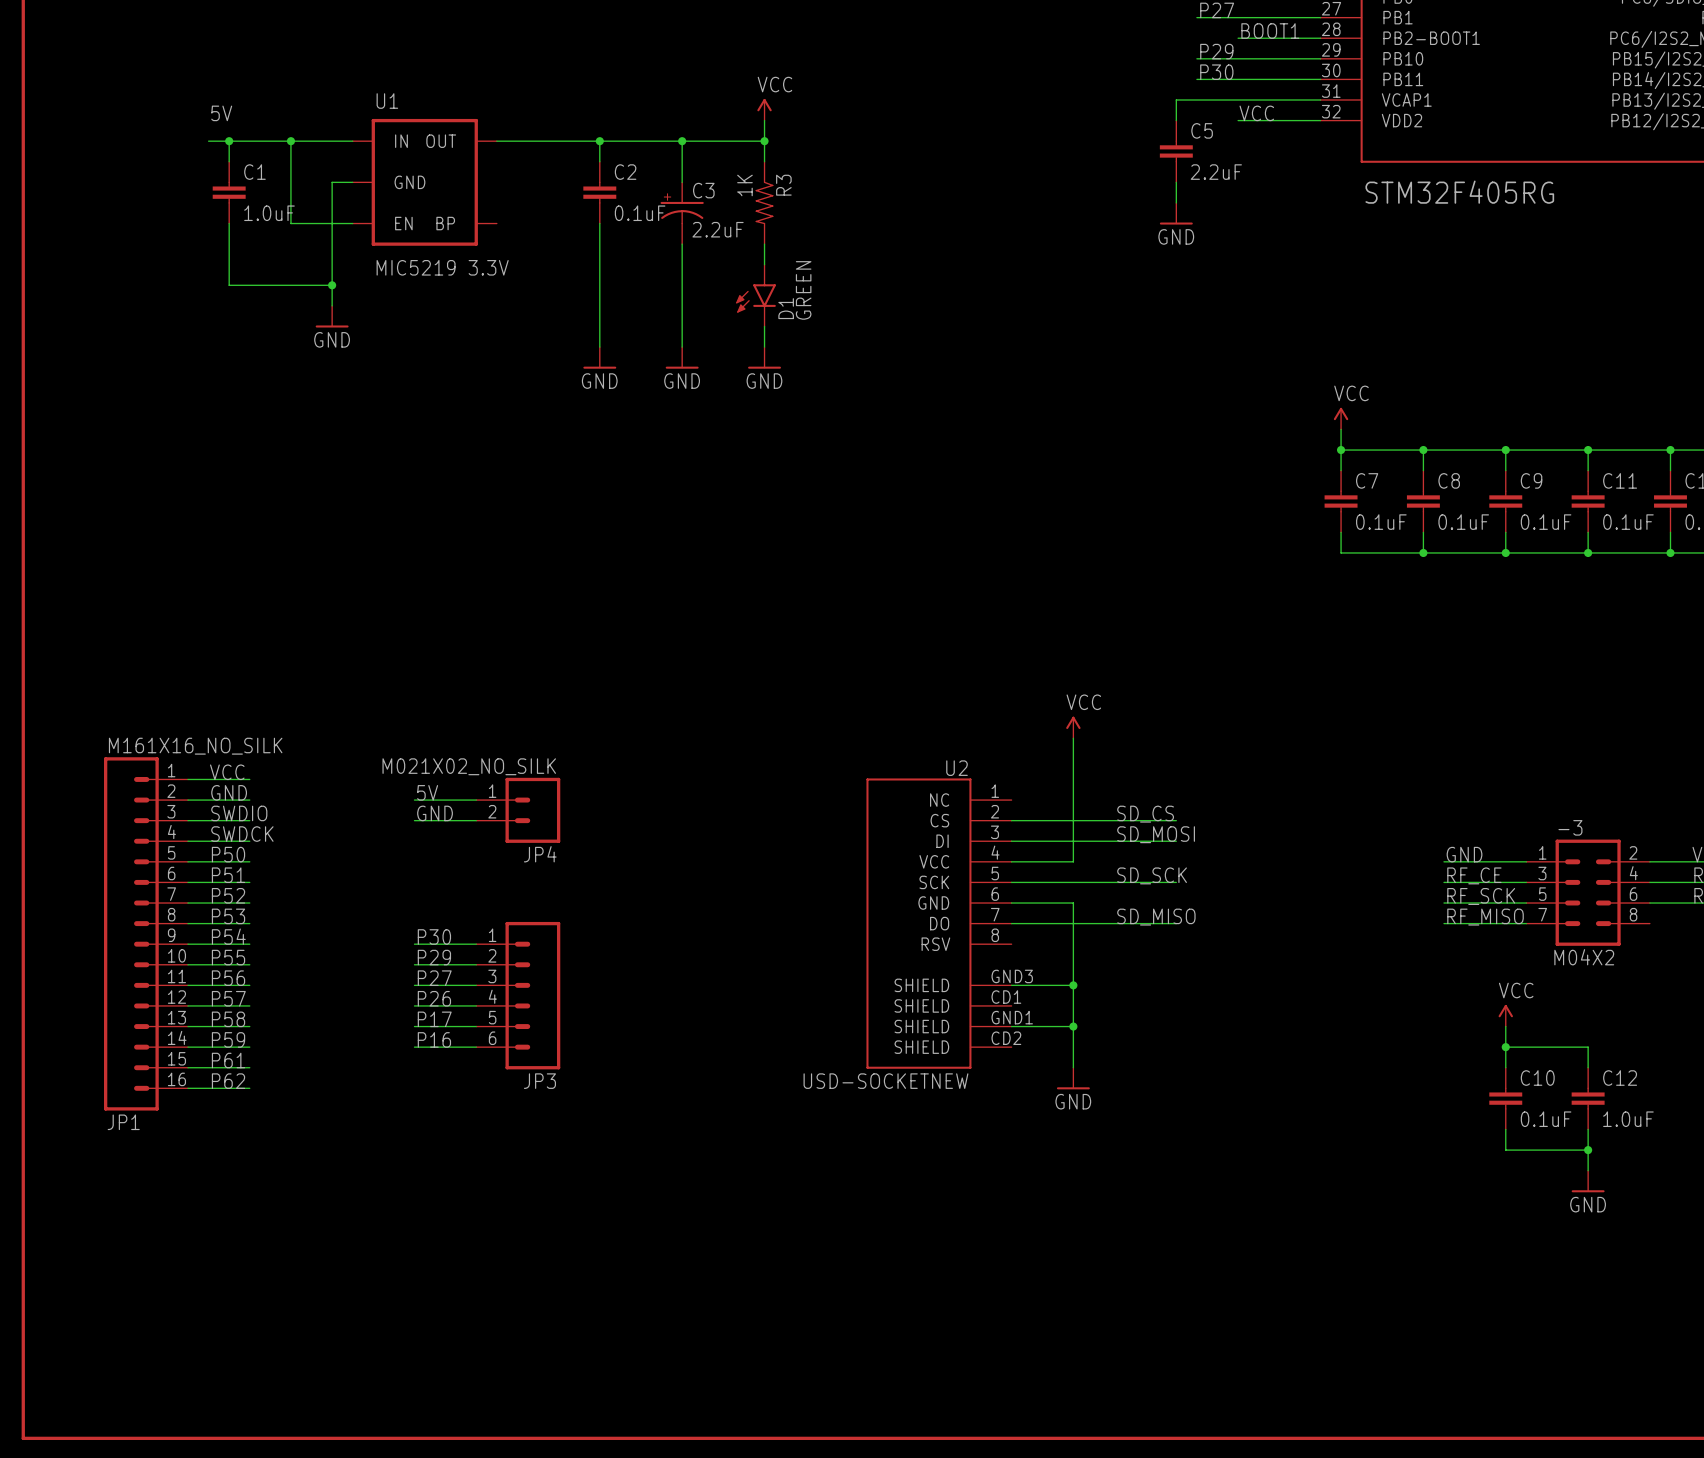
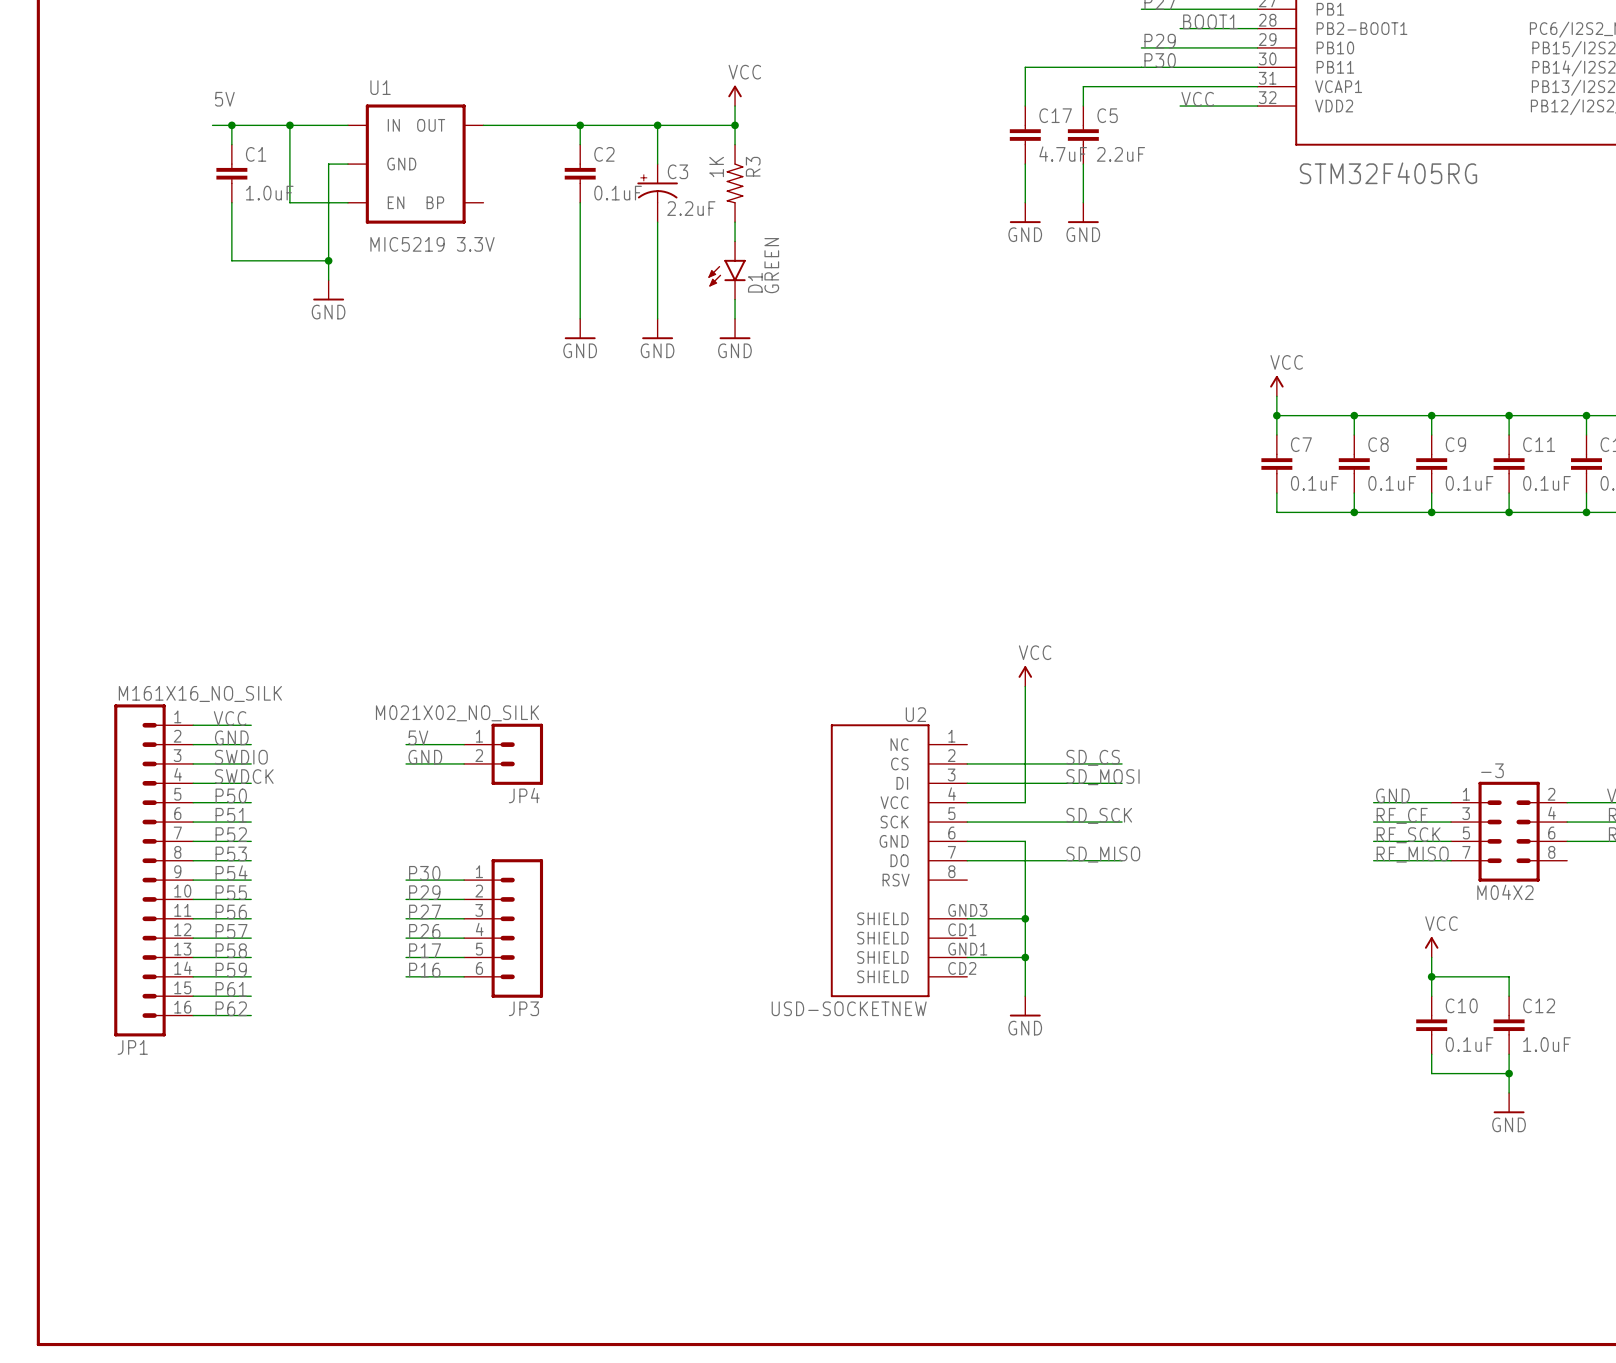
wire: none -> (1141, 67) (1025, 67) (1025, 106)
wire: (1176, 99) (1176, 120) -> (1122, 86) (1083, 86) (1083, 106)
C17: none -> 4.7uF (1025, 135)
C5 position: (1176, 151) -> (1083, 135)
wire: none -> (1025, 164) (1025, 202)
wire: none -> (1083, 164) (1083, 202)
wire: (1176, 182) (1176, 202) -> none
power symbol position: GND (1176, 213) -> GND (1083, 212)
power symbol: none -> GND (1025, 212)

